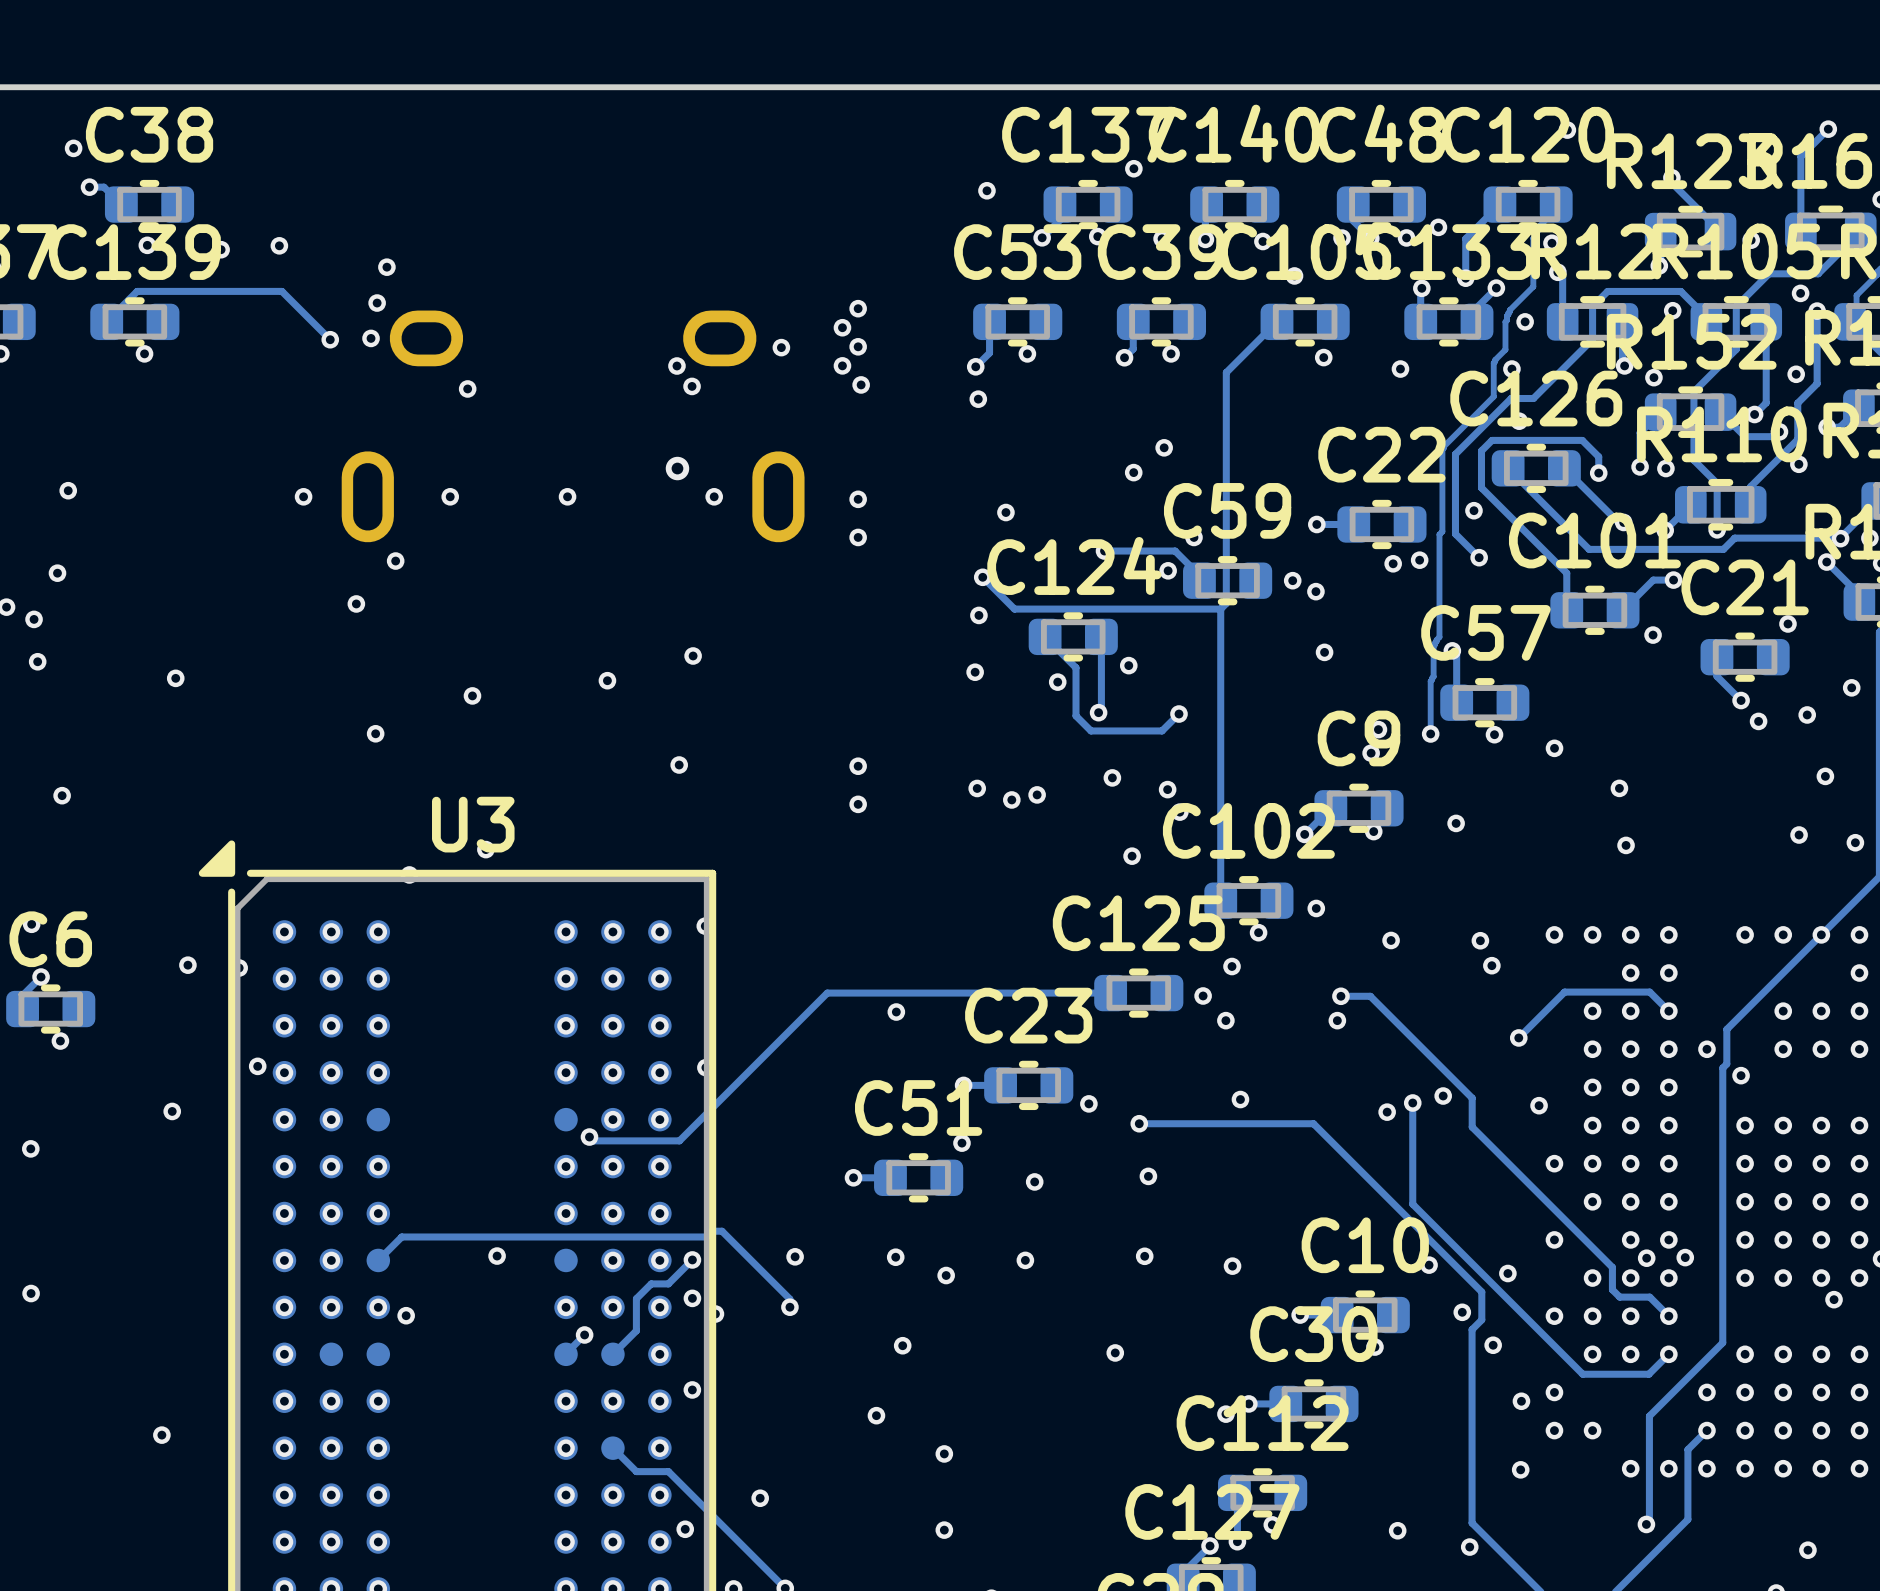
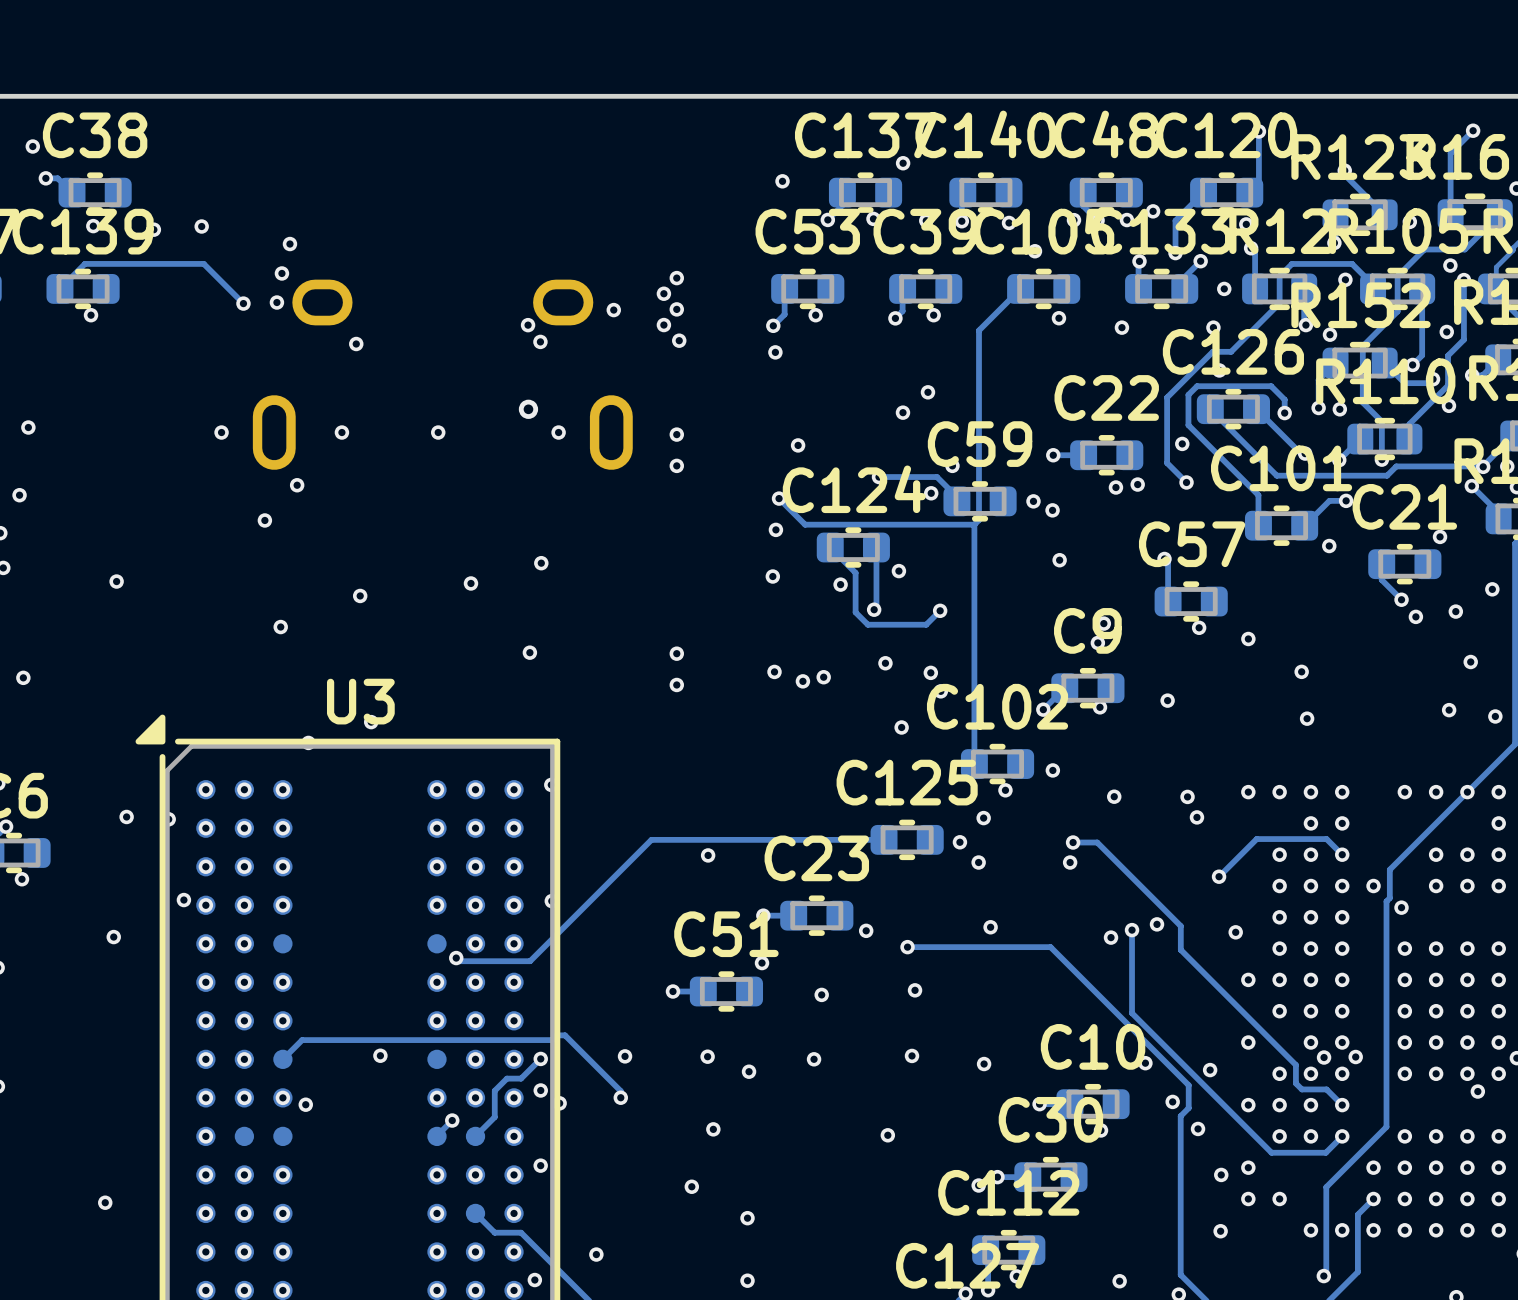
track: none -> (1258, 131) (1258, 183) (1249, 192)
track: (1553, 207) (1553, 211) (1539, 226) (1533, 238) (1533, 286) (1509, 310) (1506, 316) (1505, 349) (1493, 362) (1493, 396) (1442, 449) (1442, 531) (1439, 534) (1439, 637) (1433, 645) (1433, 676) (1430, 681) (1430, 733) -> none
via: (1430, 733) -> none

